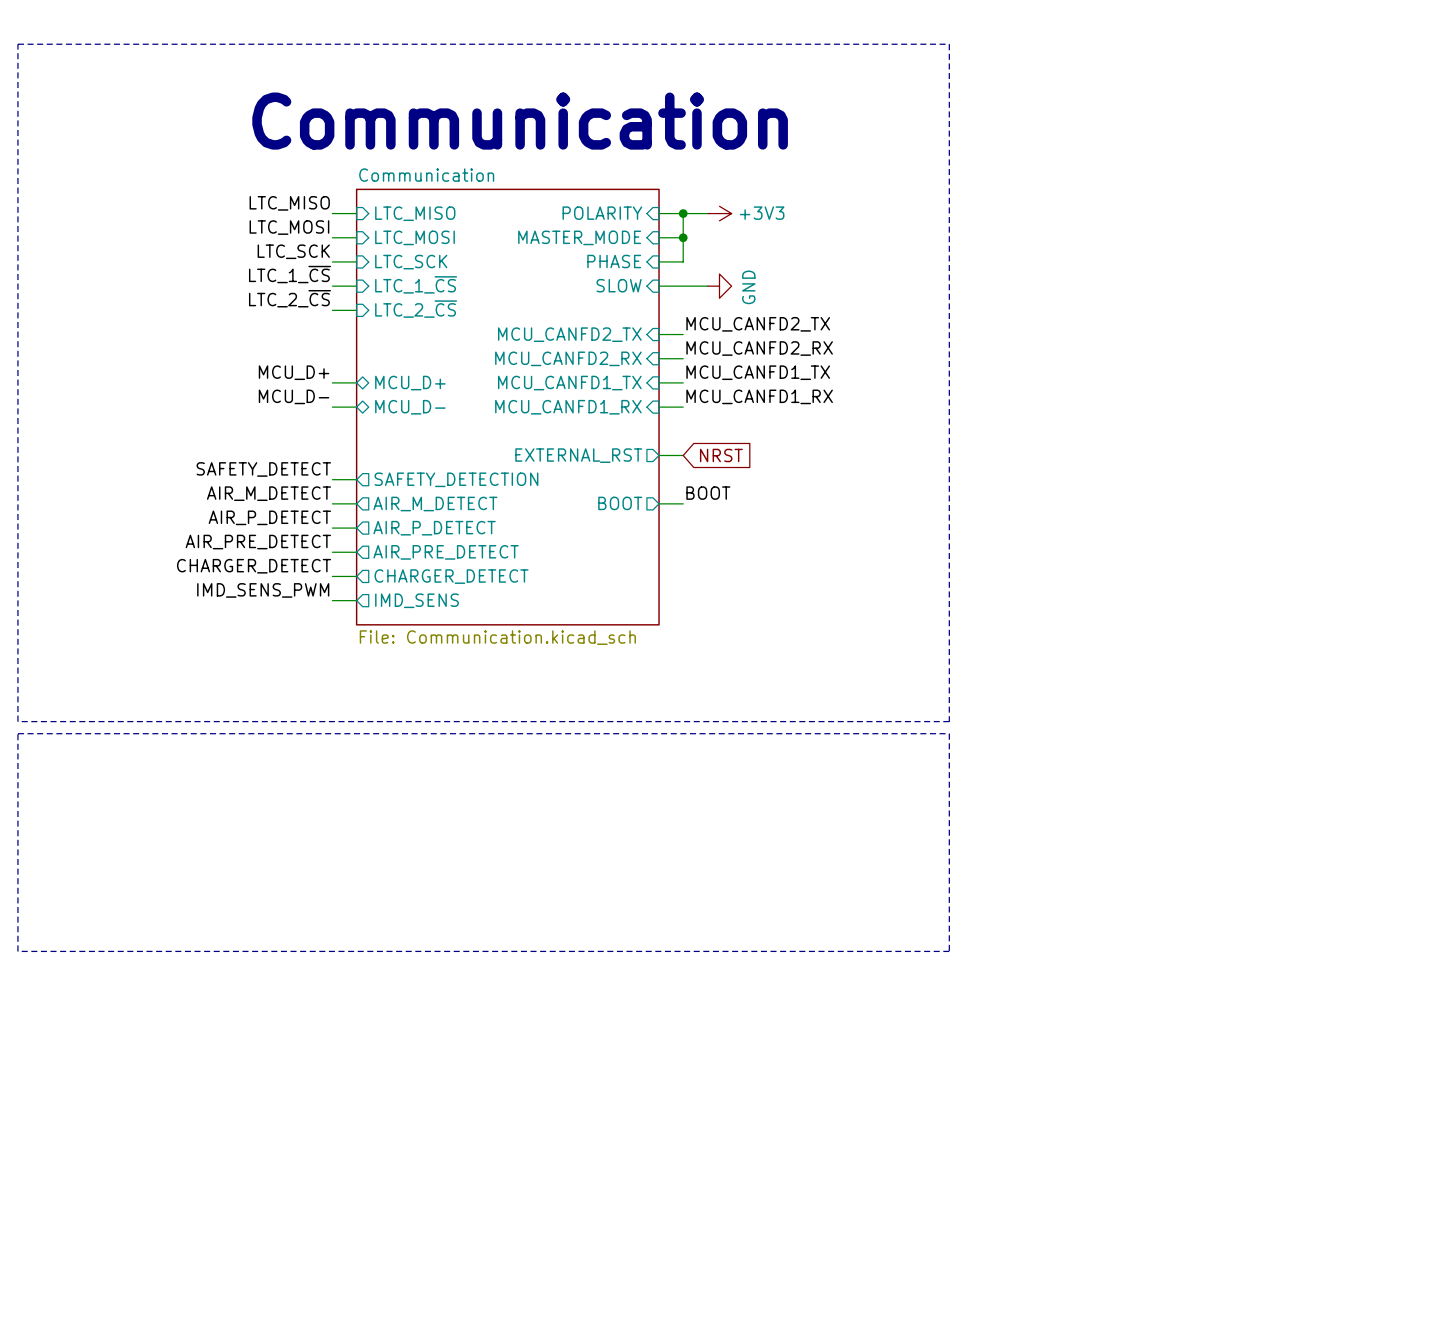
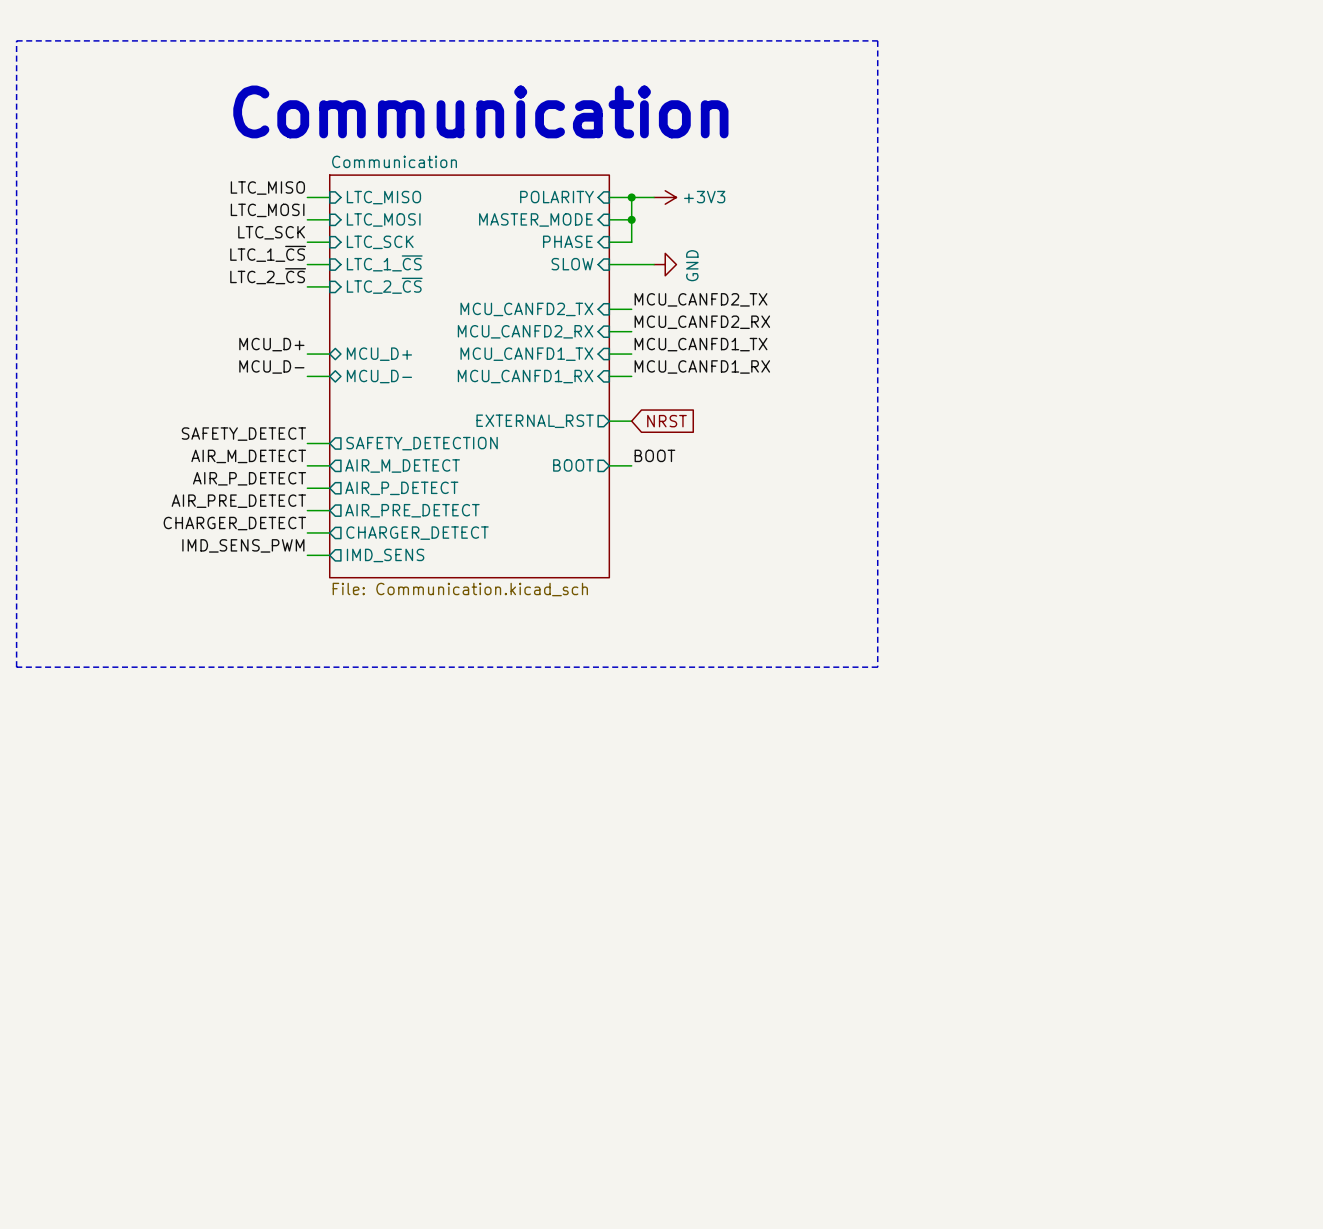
line: (17, 733) (949, 733) (949, 951) (17, 951) (17, 733) -> none

